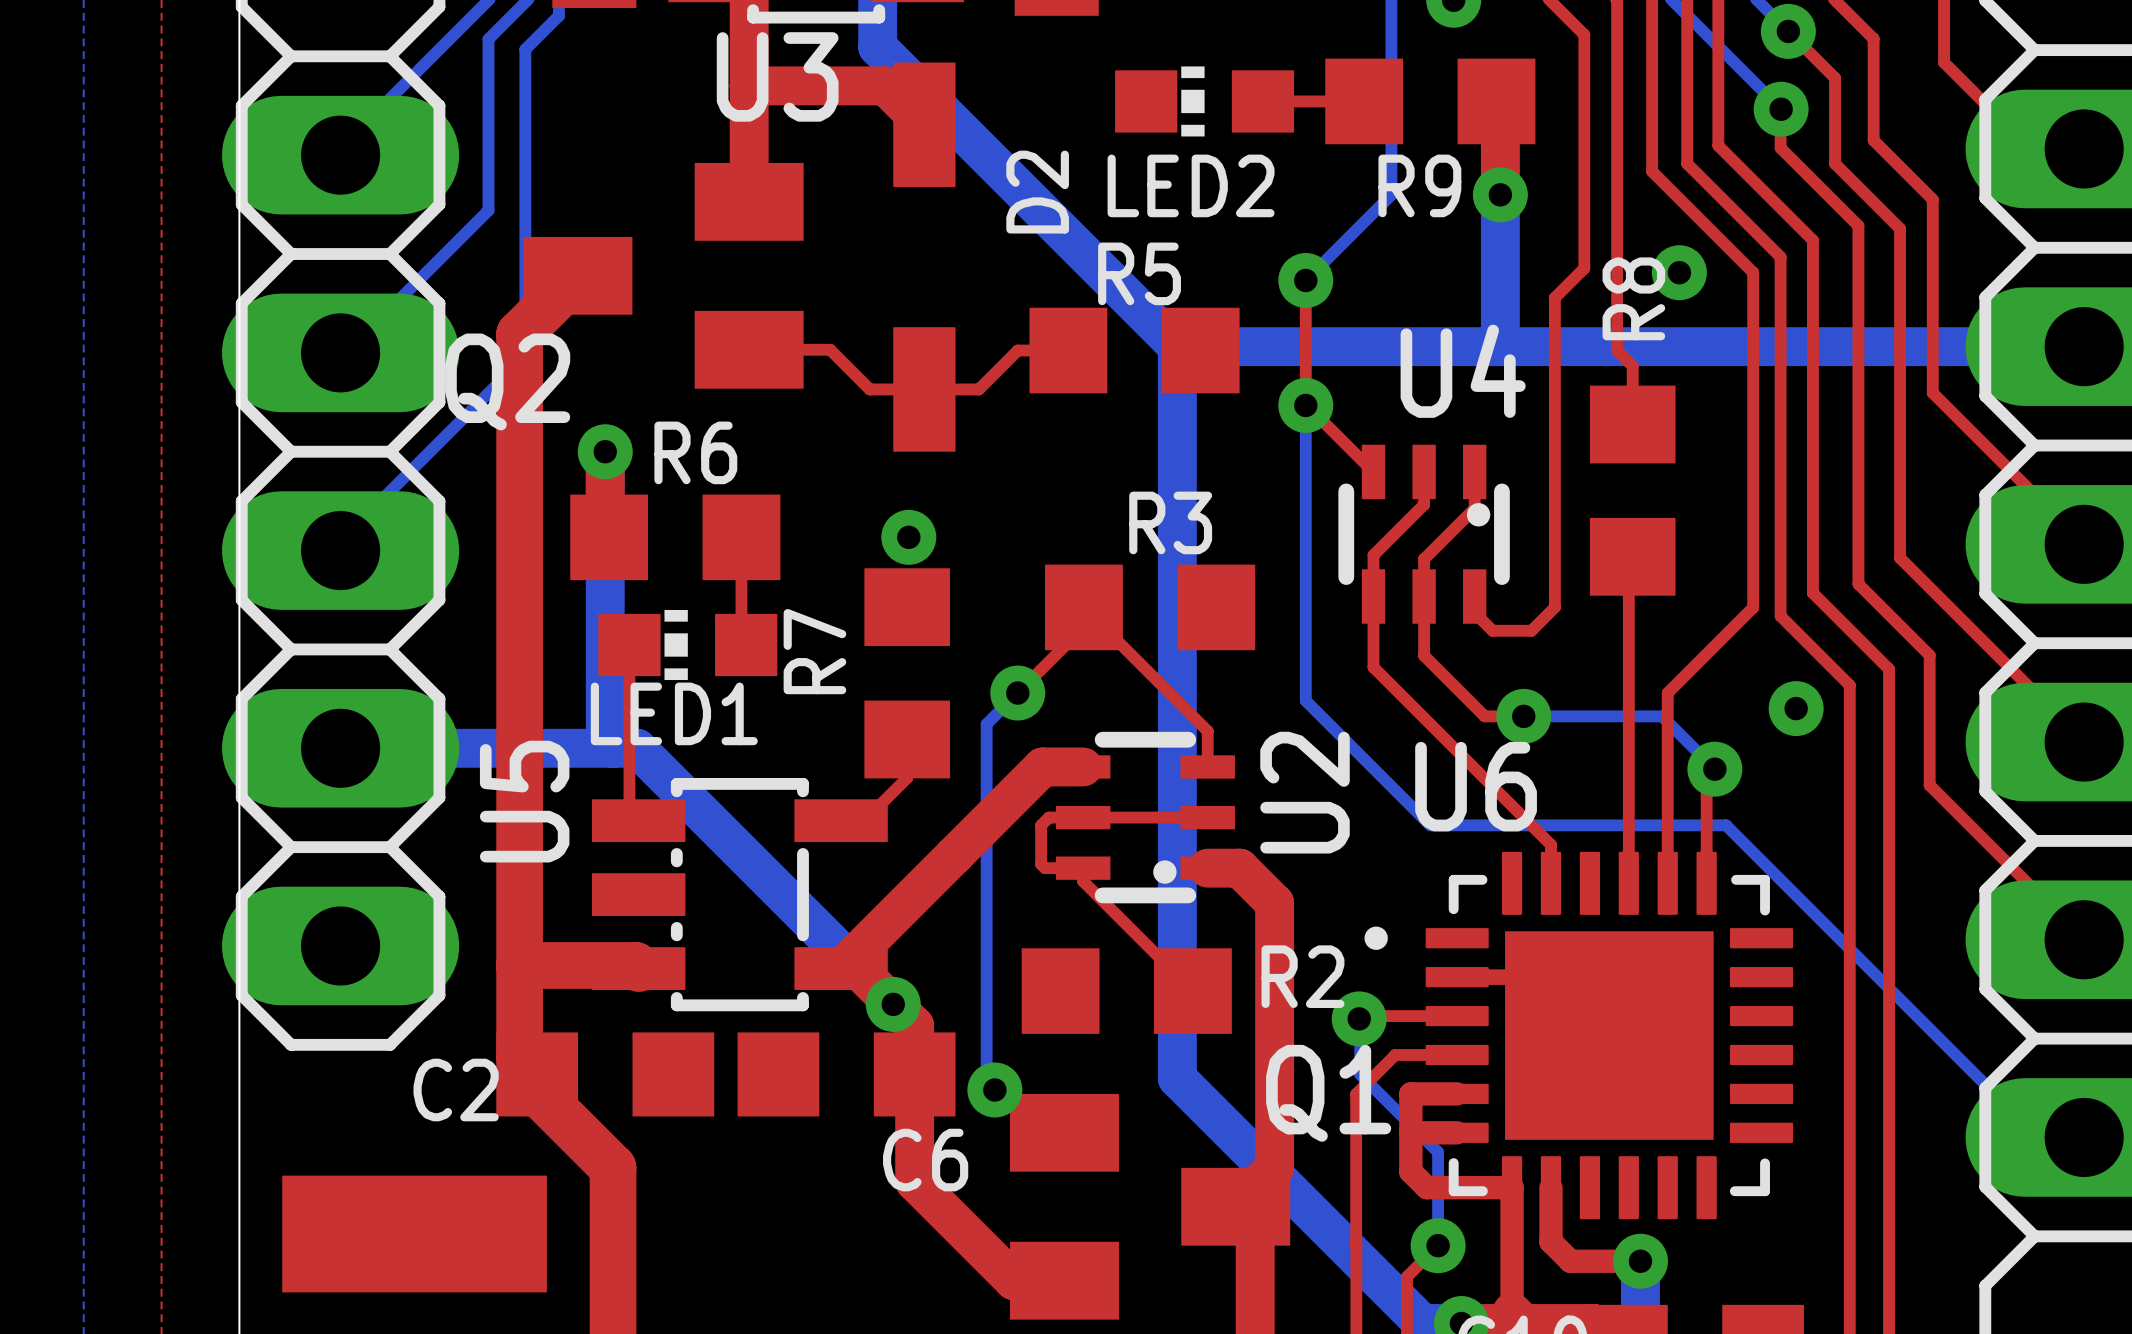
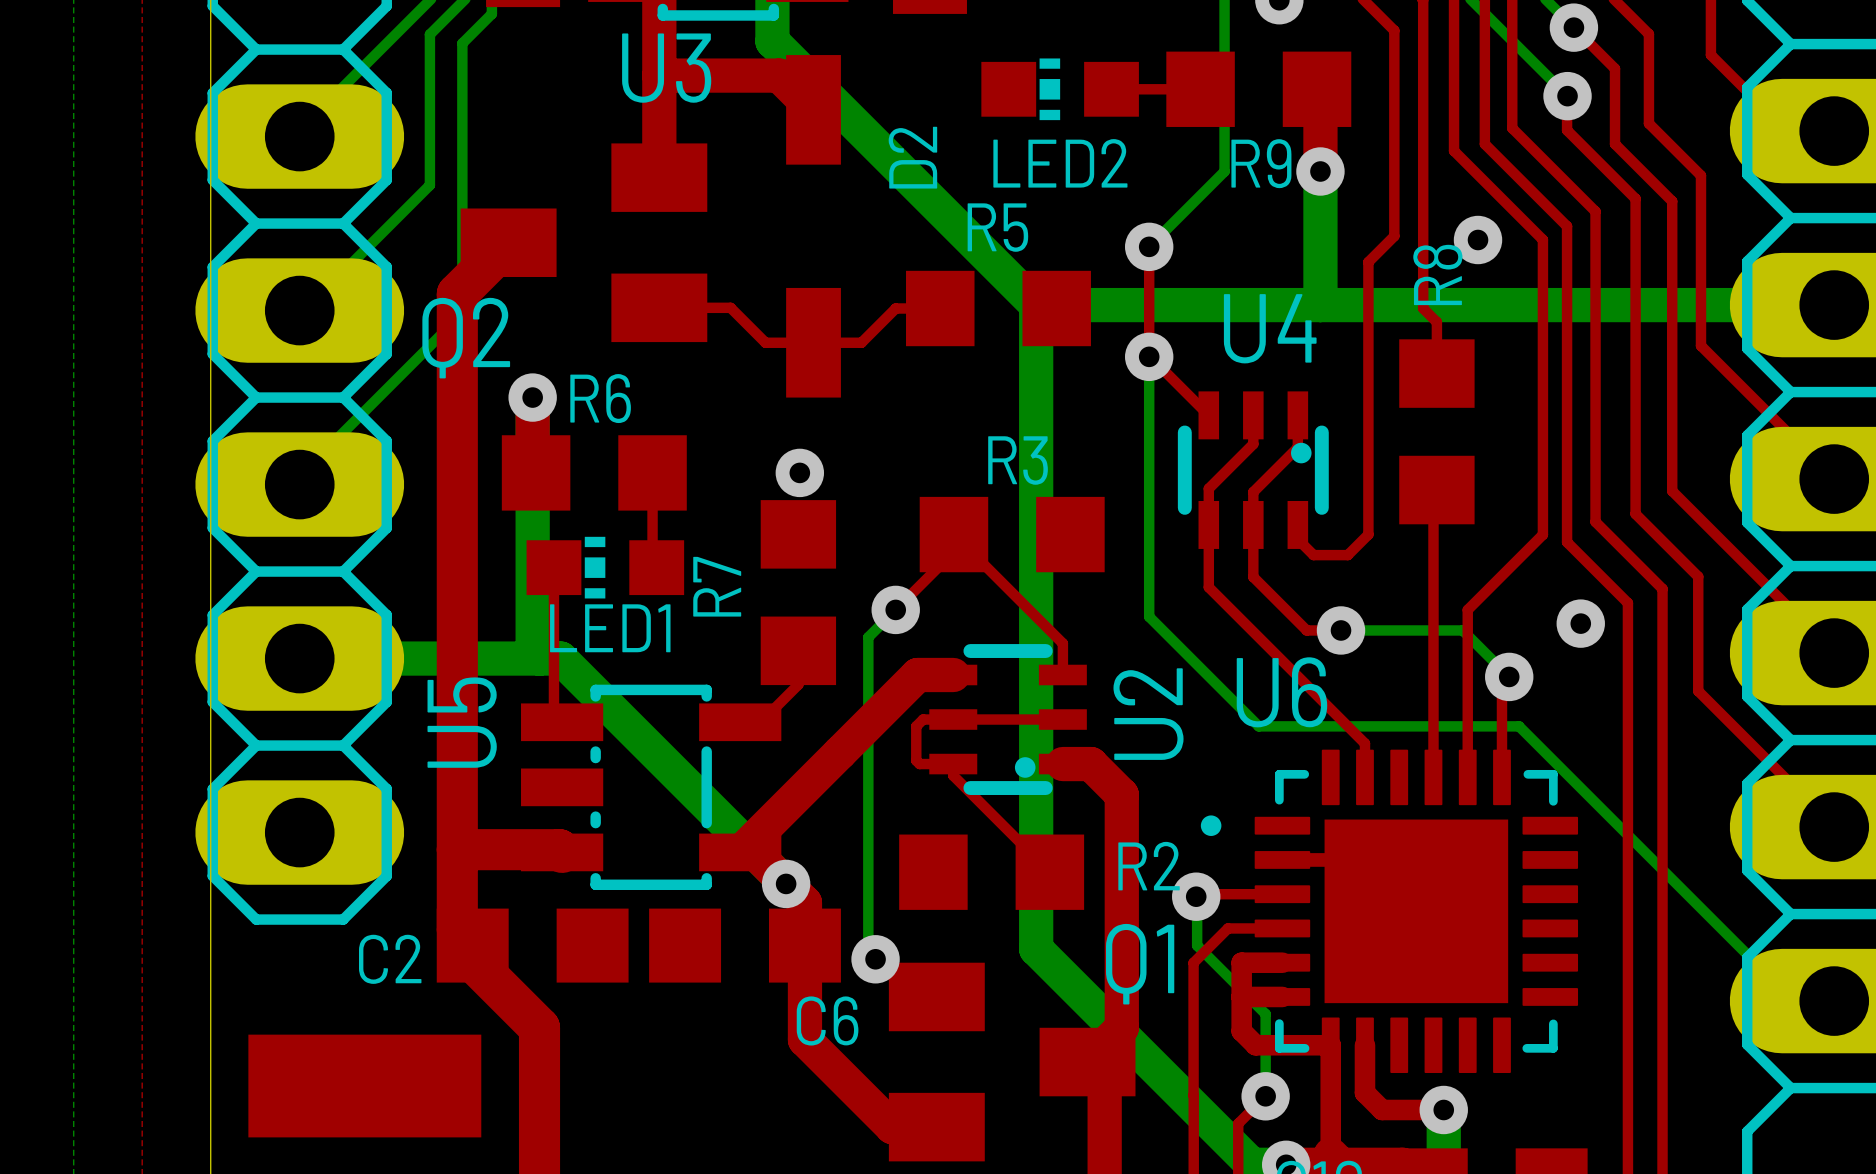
R5 name position: R5 (1139, 273) -> R5 (997, 227)
R2 name position: R2 (1302, 976) -> R2 (1149, 866)

